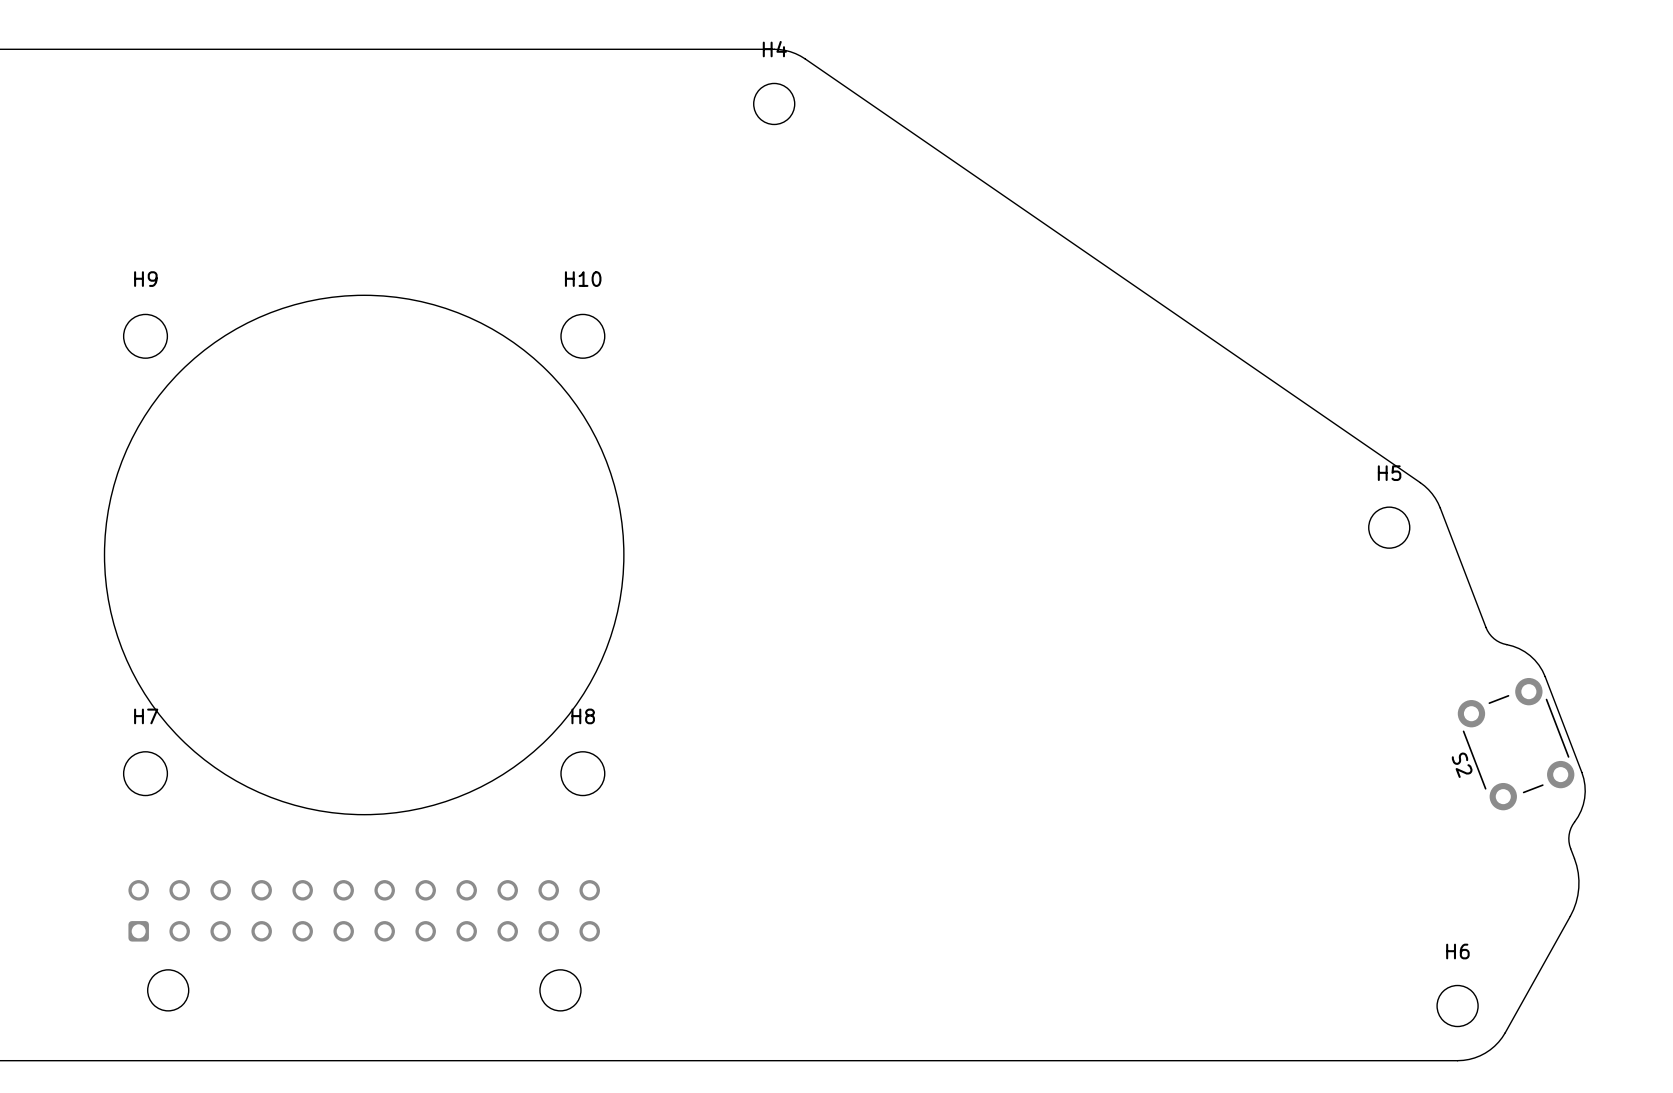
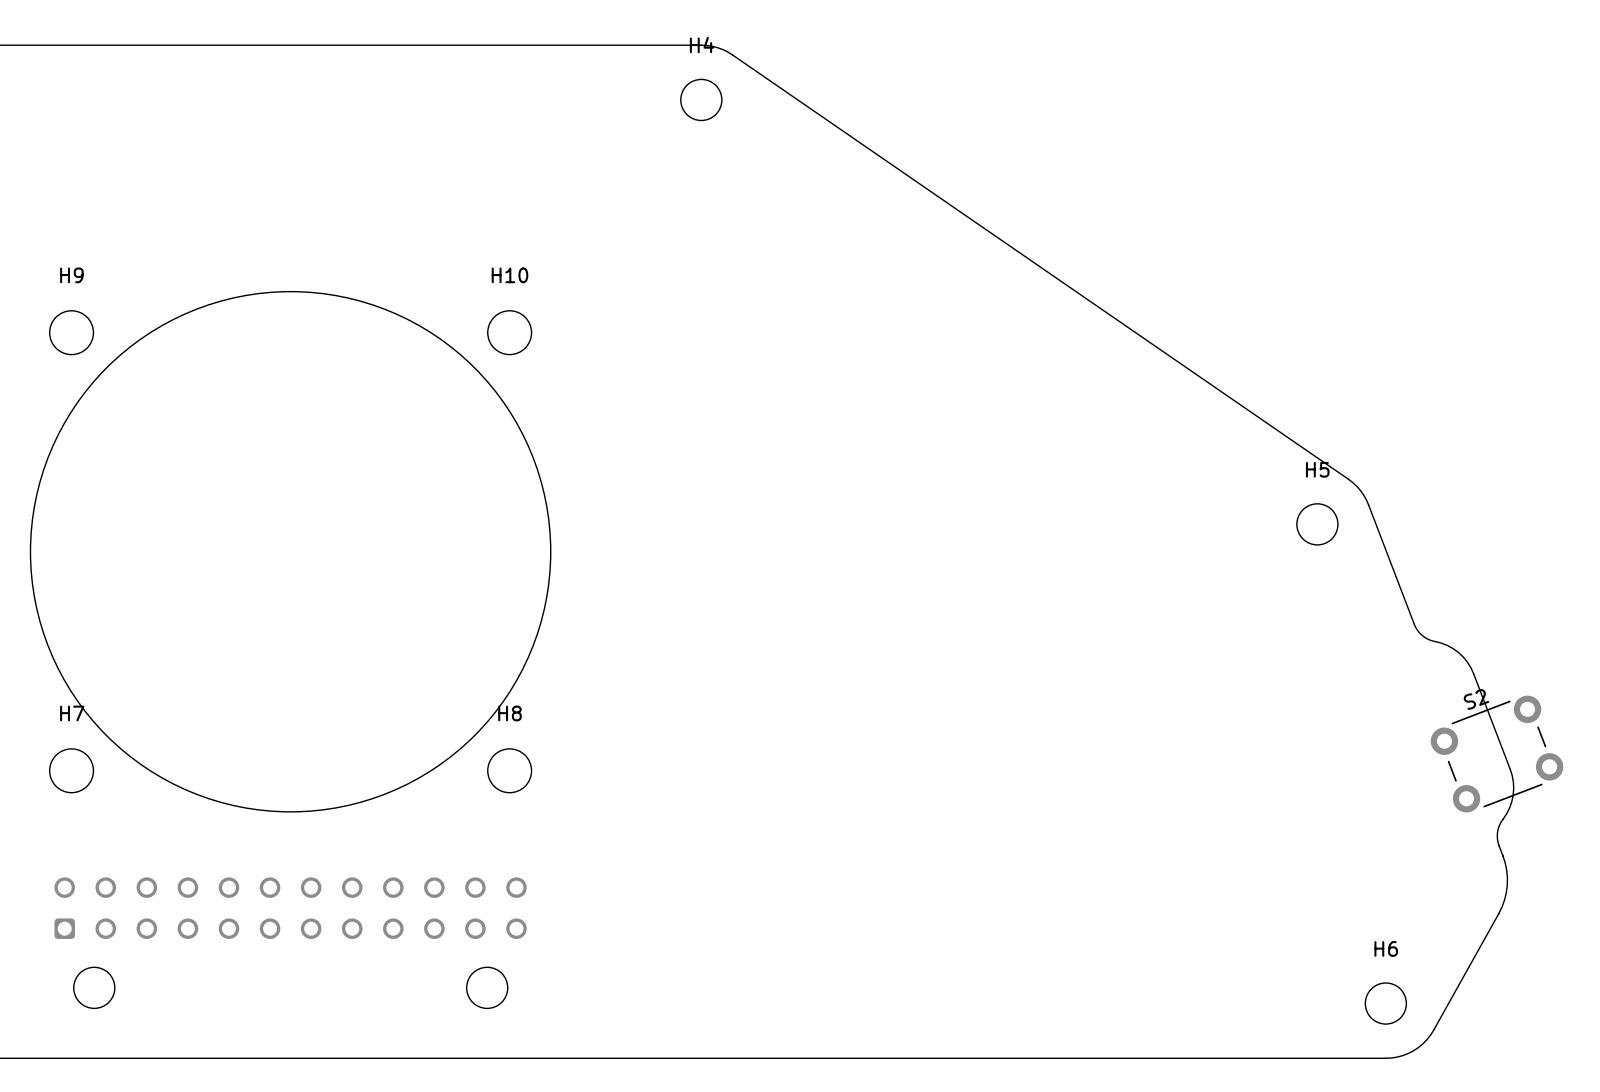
S2 rotation: 0° (1516, 744) -> 90° clockwise (1497, 754)

